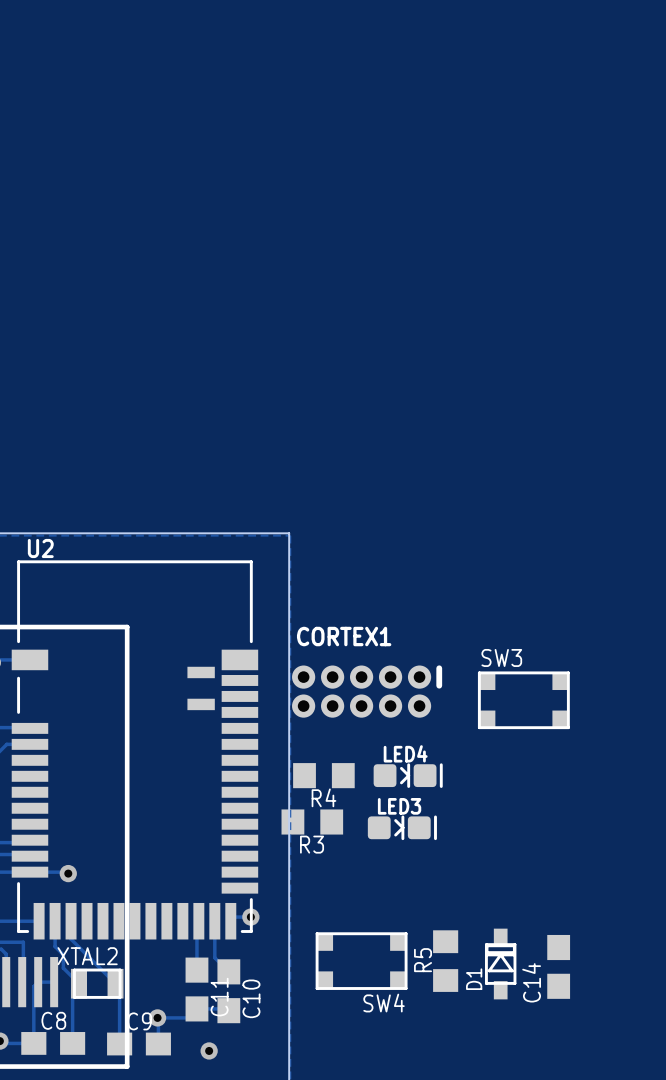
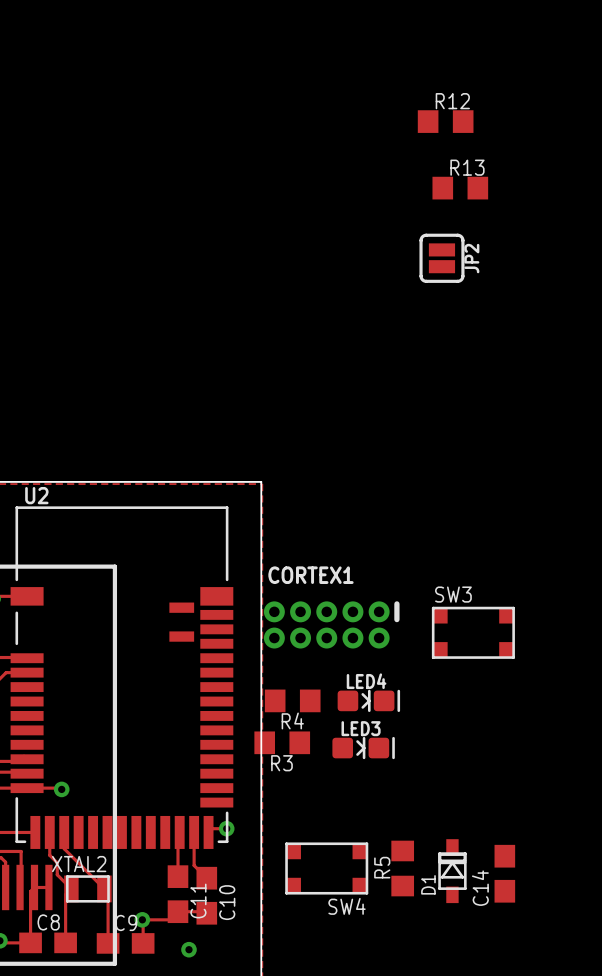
R12: none -> (445, 121)
R13: none -> (460, 188)
JP2: none -> (441, 258)

